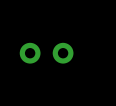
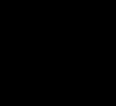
part: (46, 53) -> none

